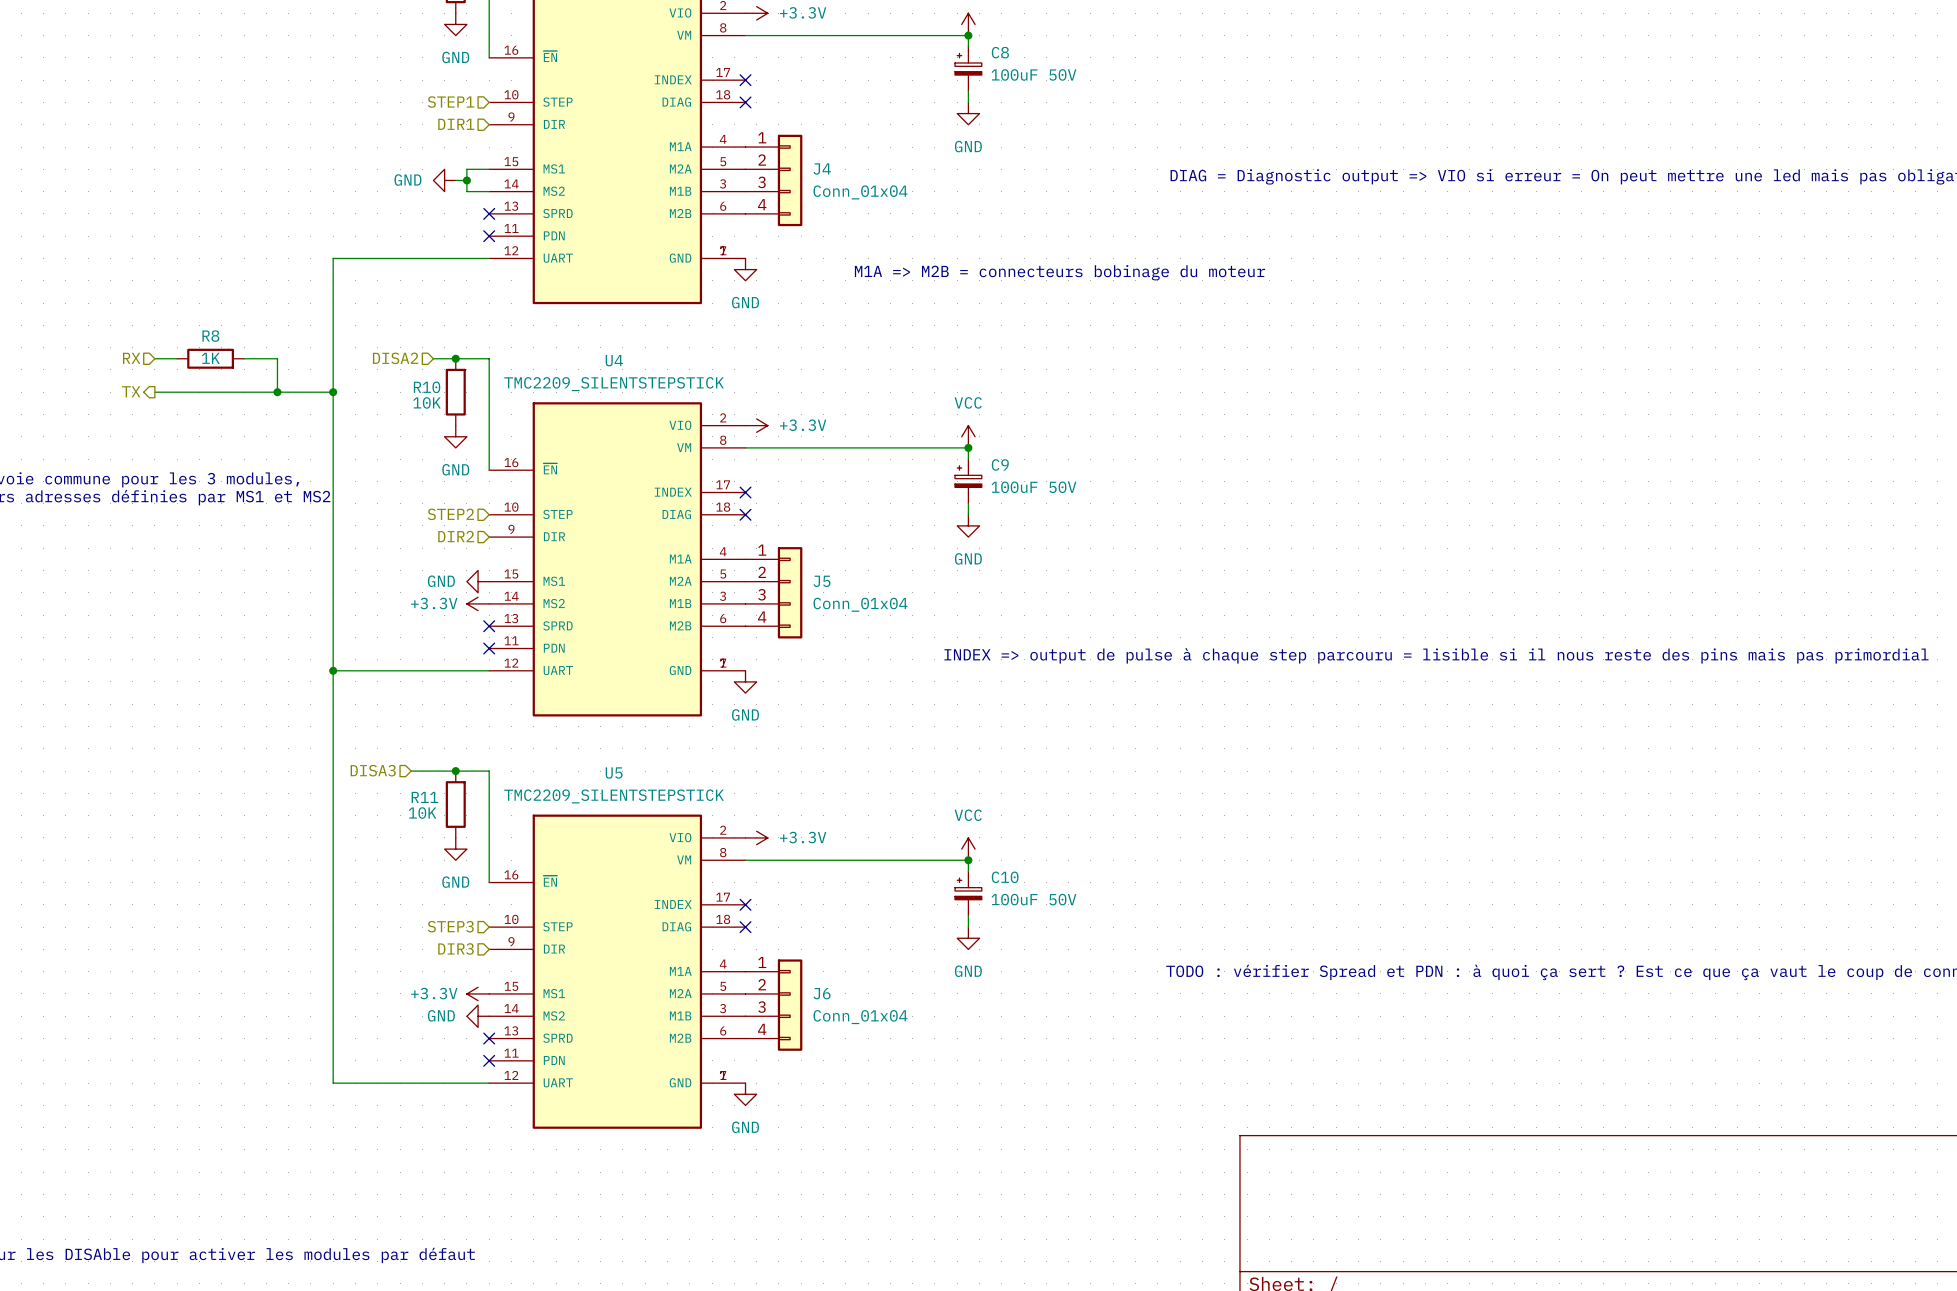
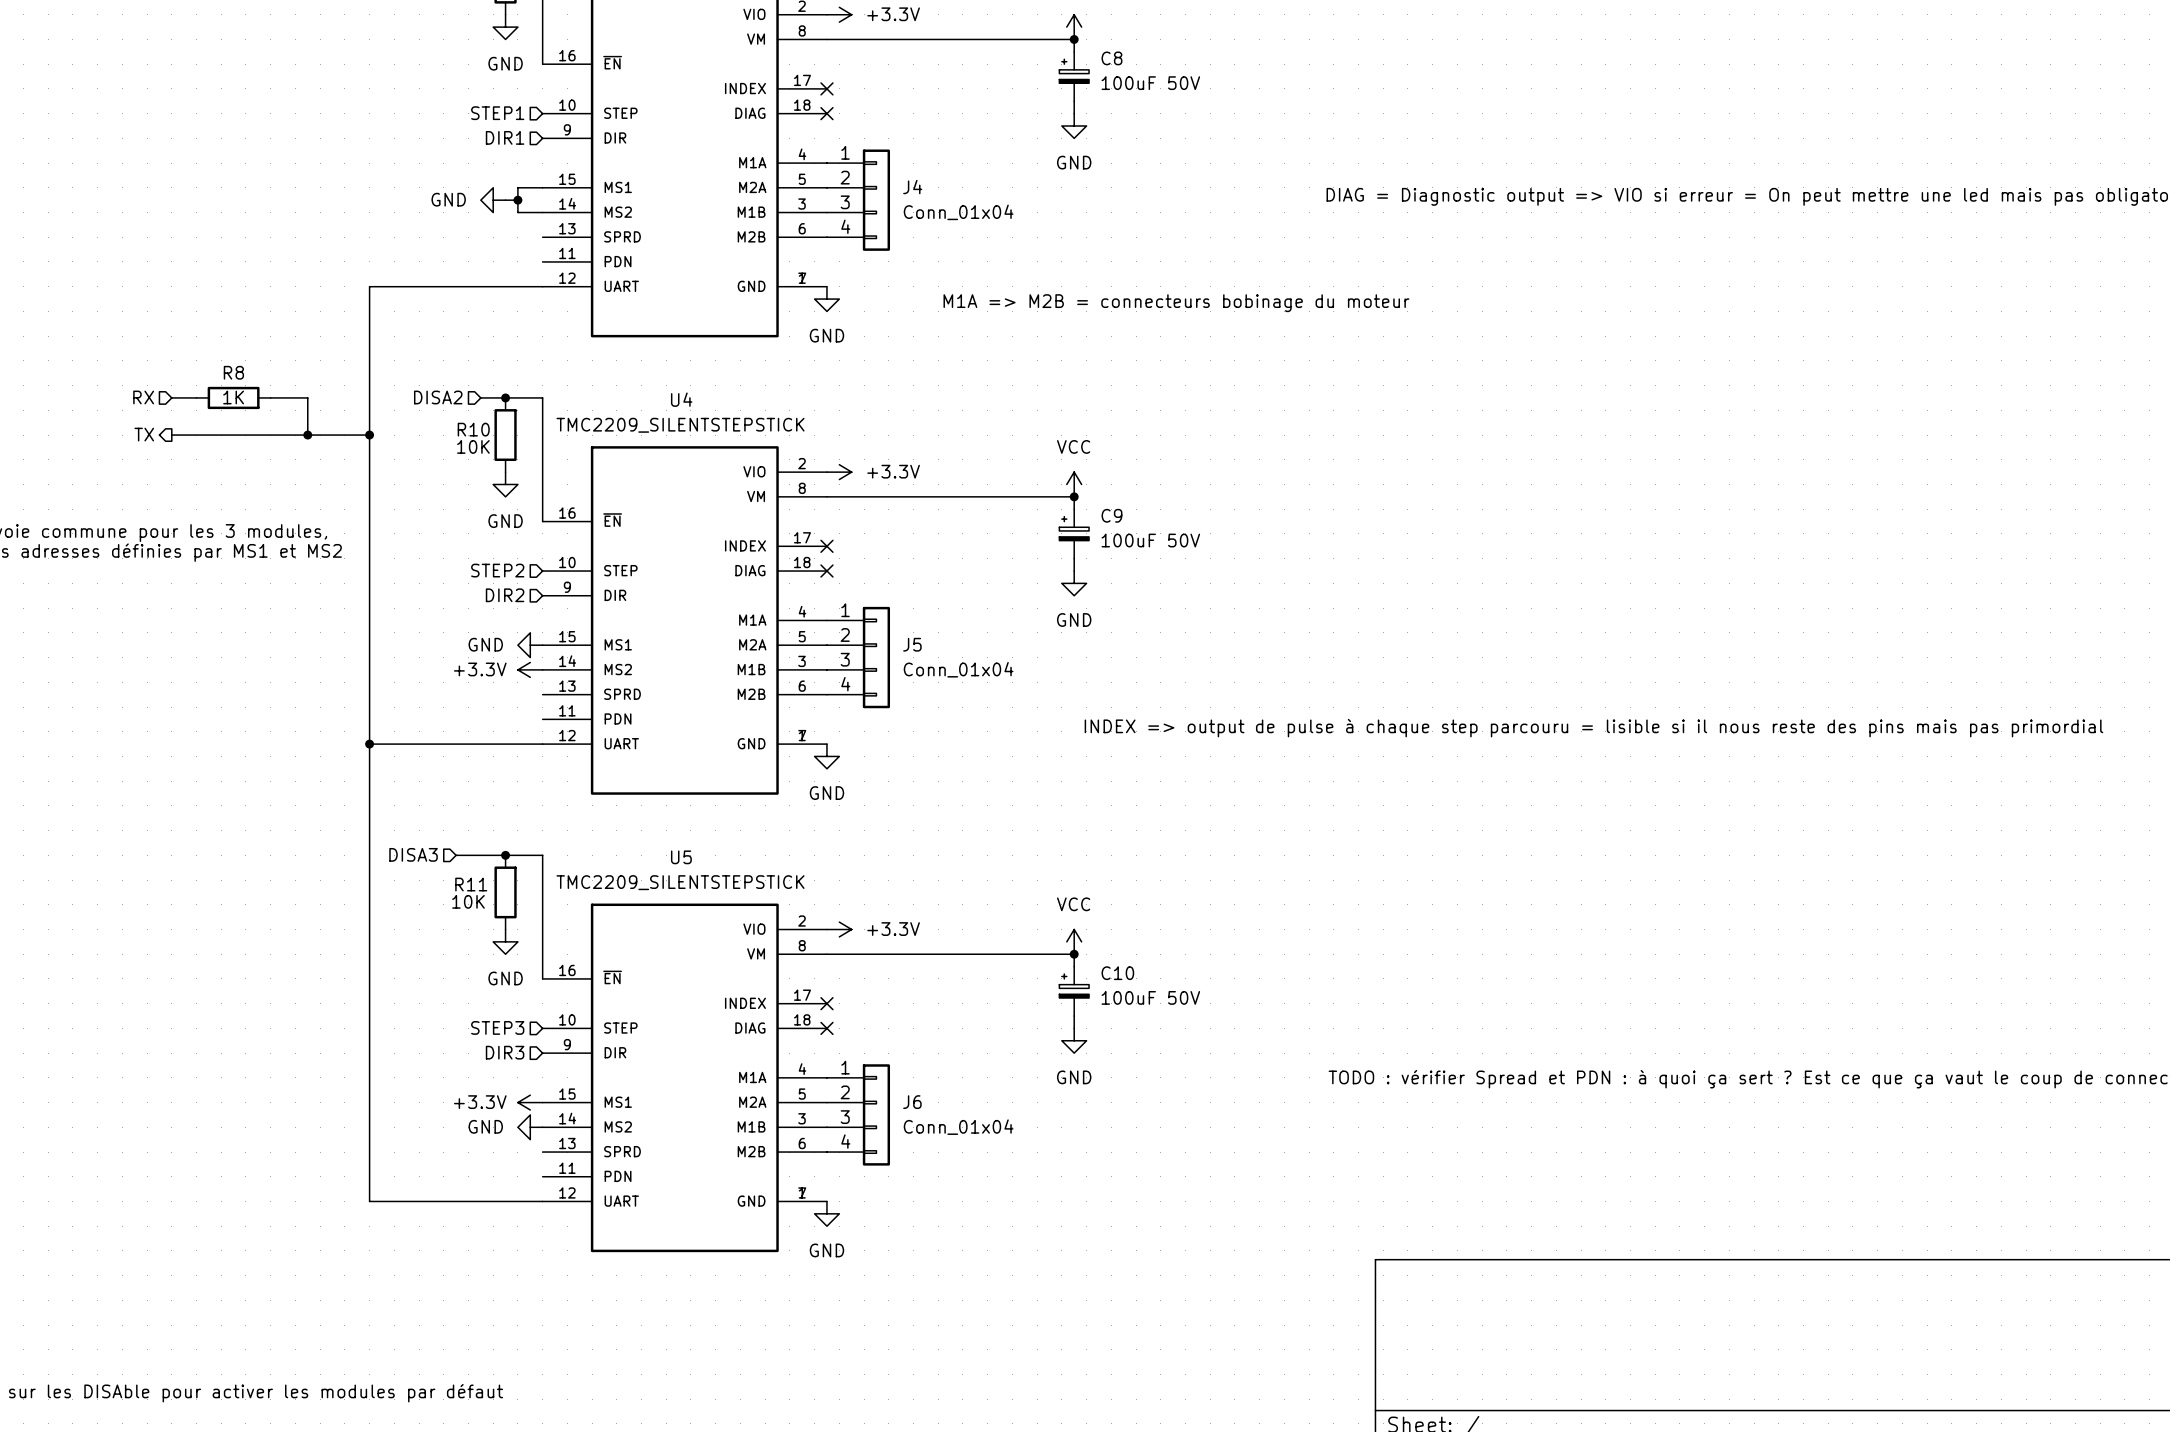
no-connect mark: (489, 213) -> none
no-connect mark: (489, 236) -> none
no-connect mark: (489, 626) -> none
no-connect mark: (489, 648) -> none
no-connect mark: (489, 1038) -> none
no-connect mark: (489, 1060) -> none

